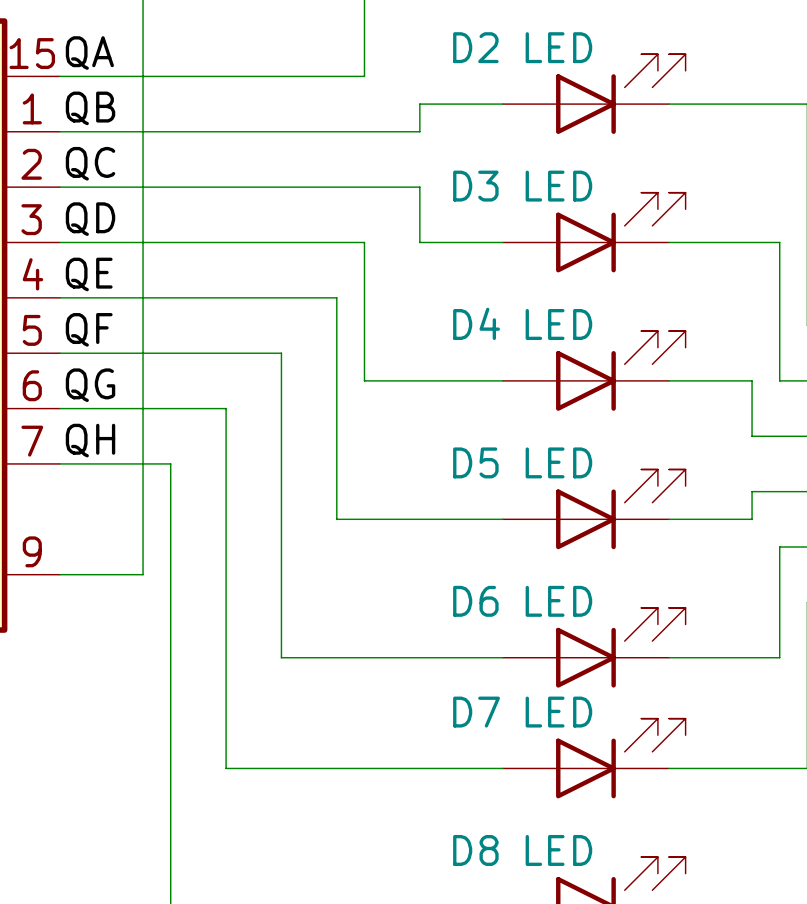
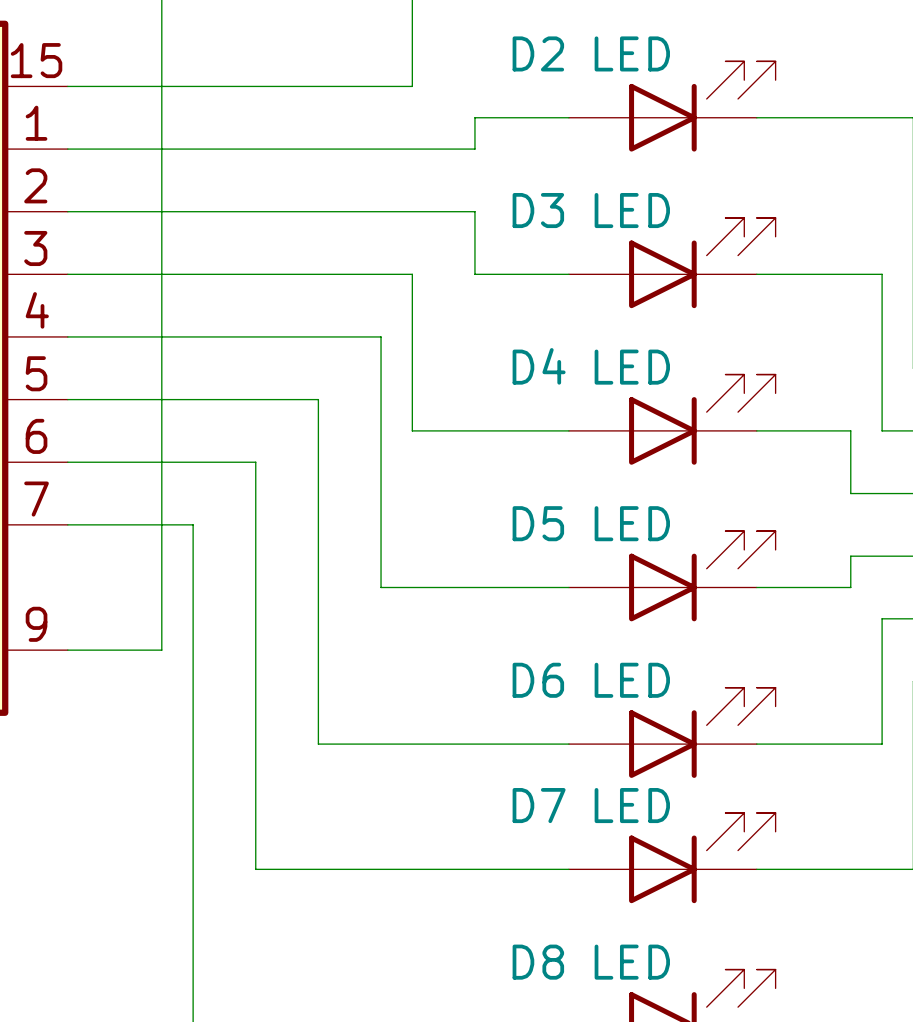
label: QA (89, 53) -> none
label: QB (90, 108) -> none
label: QC (90, 163) -> none
label: QD (90, 219) -> none
label: QE (89, 274) -> none
label: QF (89, 329) -> none
label: QG (90, 385) -> none
label: QH (90, 440) -> none

